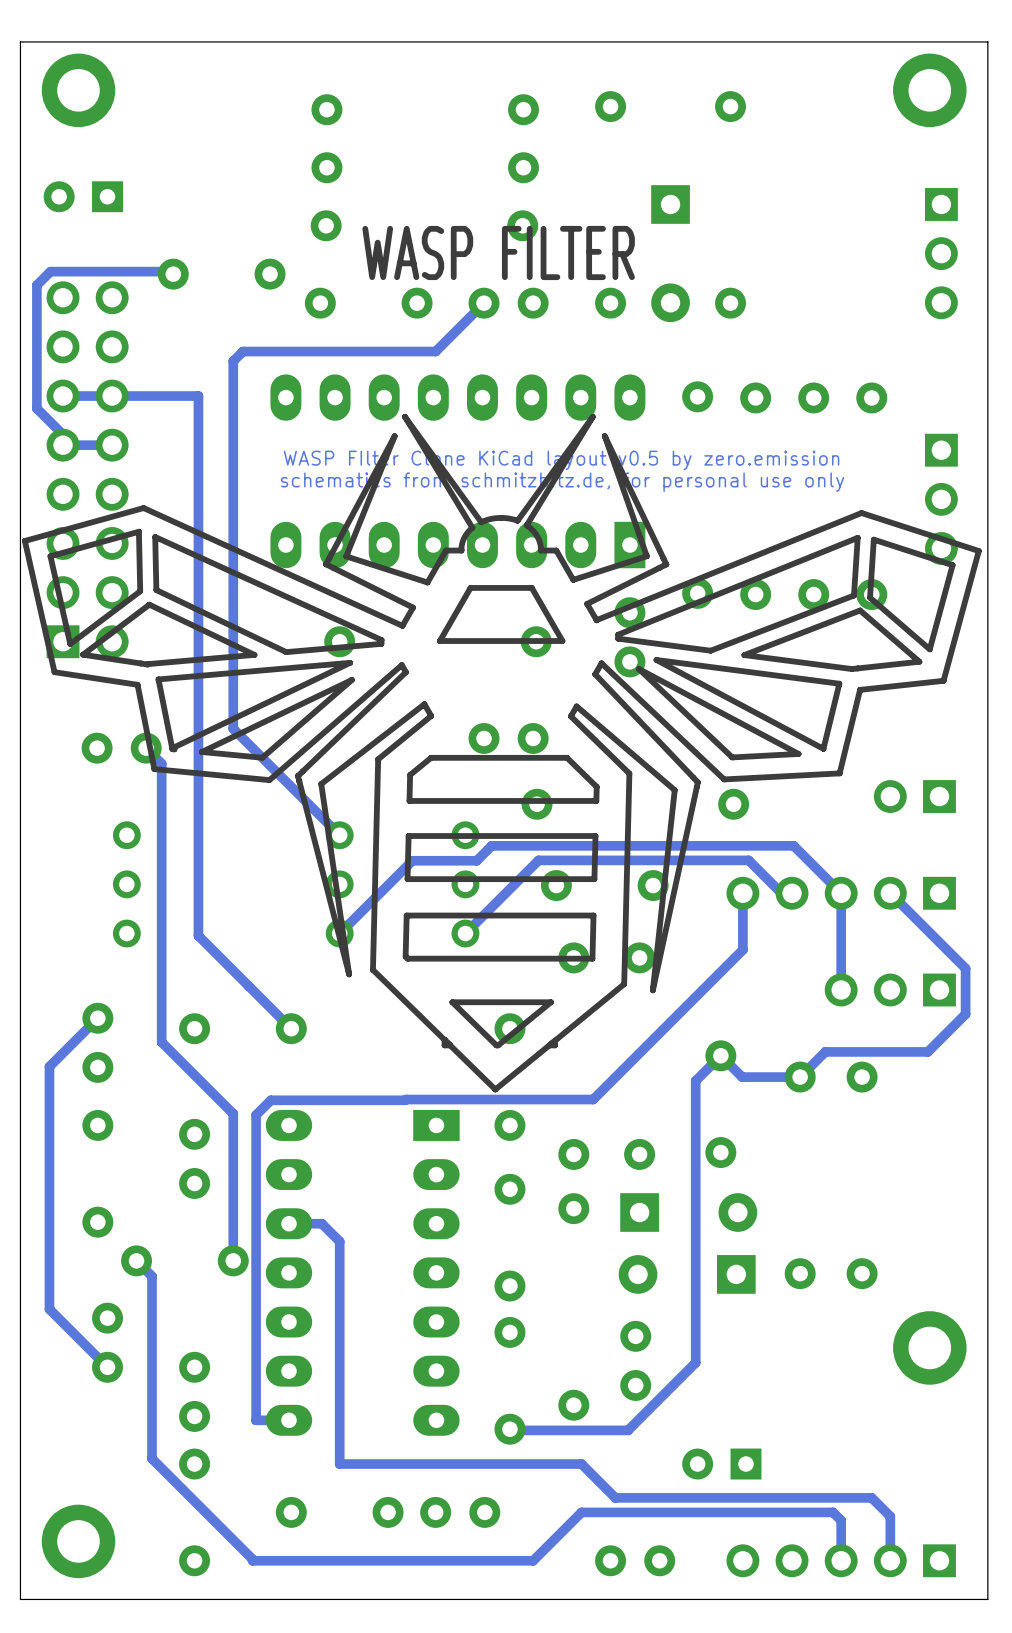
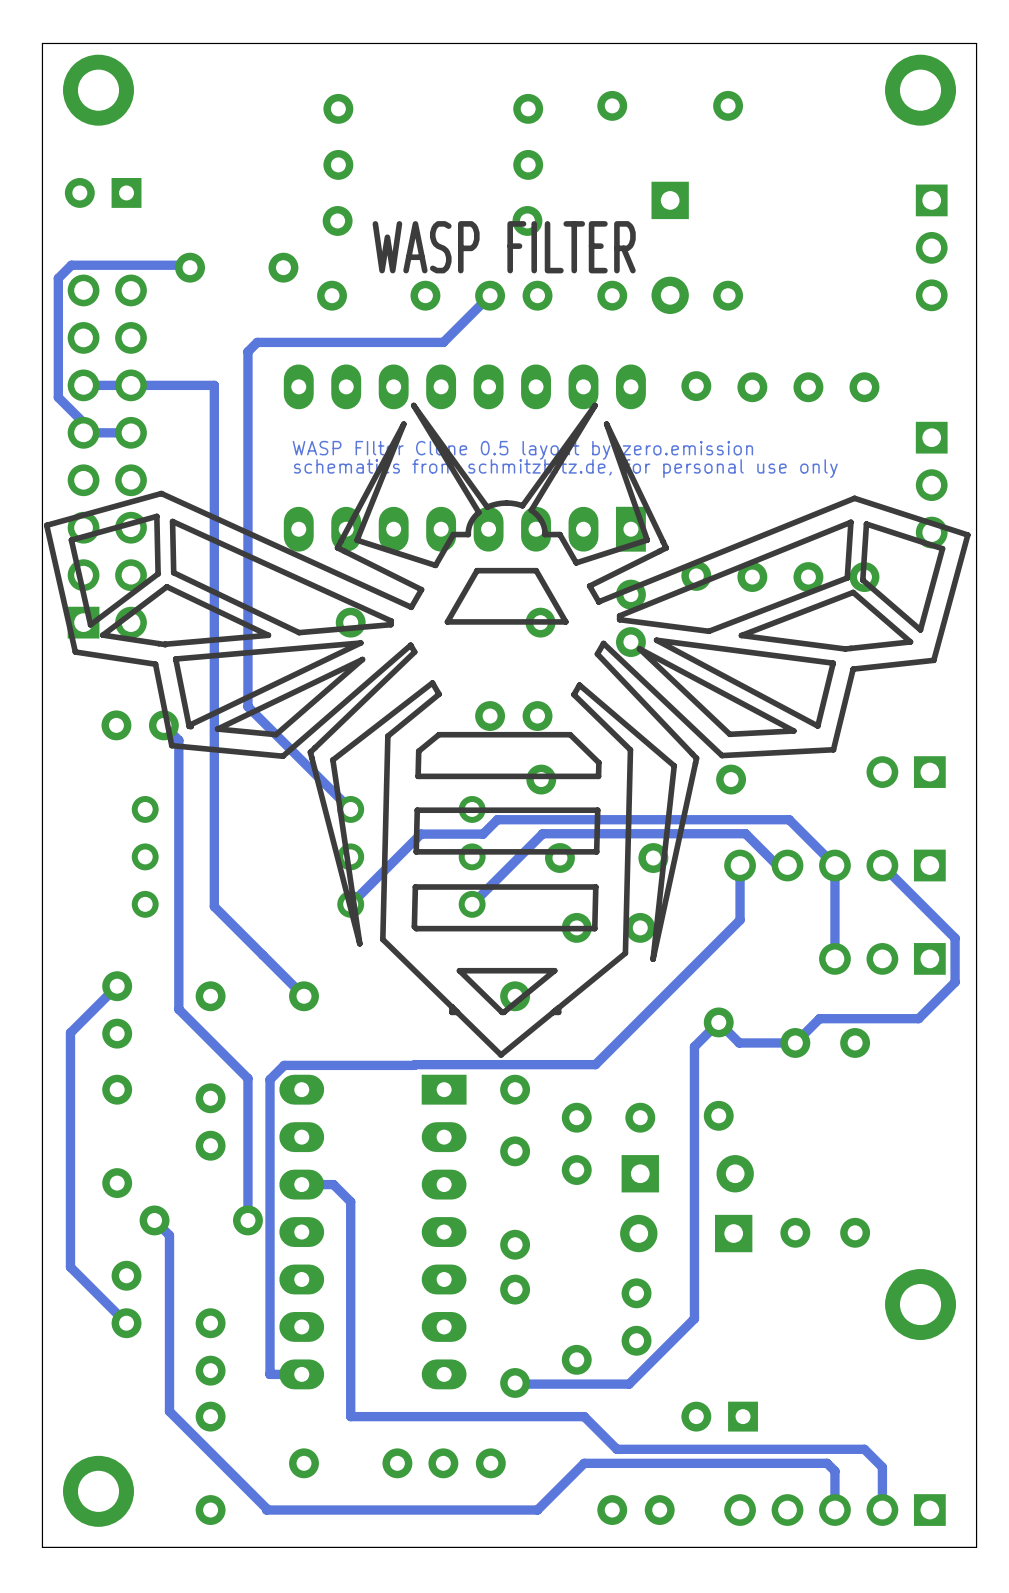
text: WASP FIlter Clone KiCad layout v0.5 by zero.emission (561, 460) -> WASP FIlter Clone 0.5 layout by zero.emission (522, 450)

